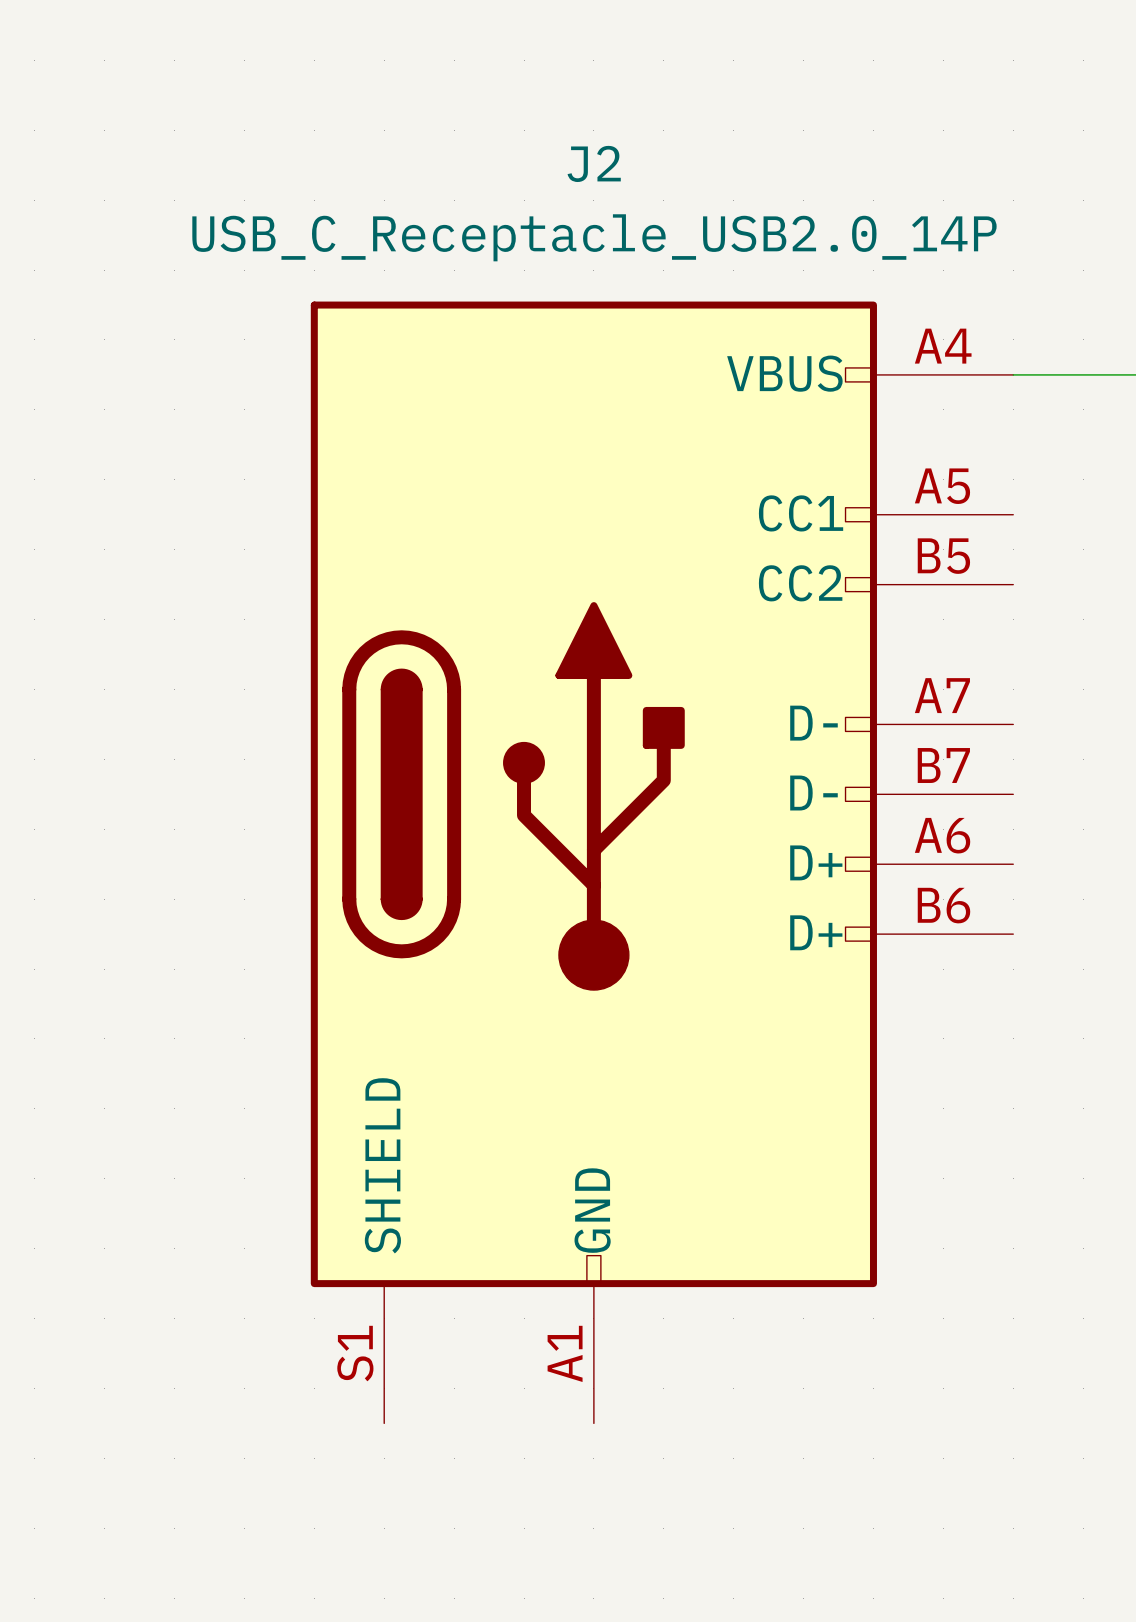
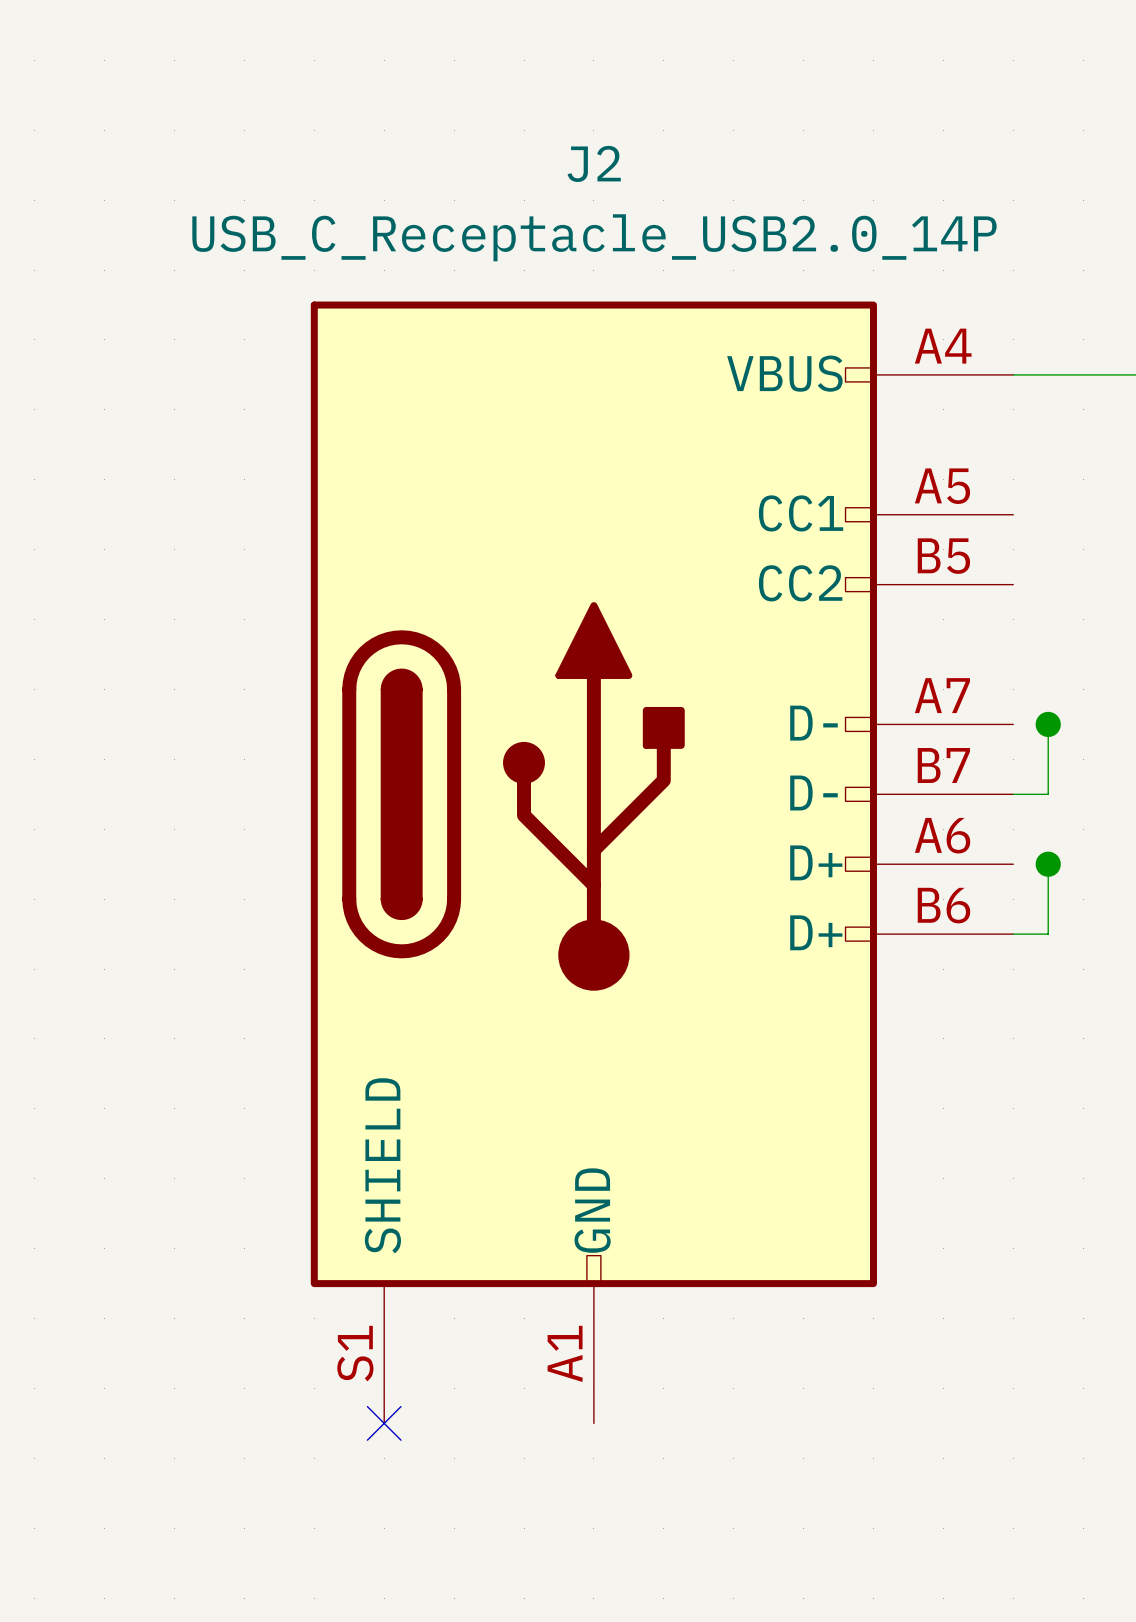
wire: none -> (1048, 724) (1048, 794) (1013, 794)
junction: none -> (1048, 724)
wire: none -> (1048, 864) (1048, 934) (1013, 934)
junction: none -> (1048, 864)
no-connect mark: none -> (384, 1423)

